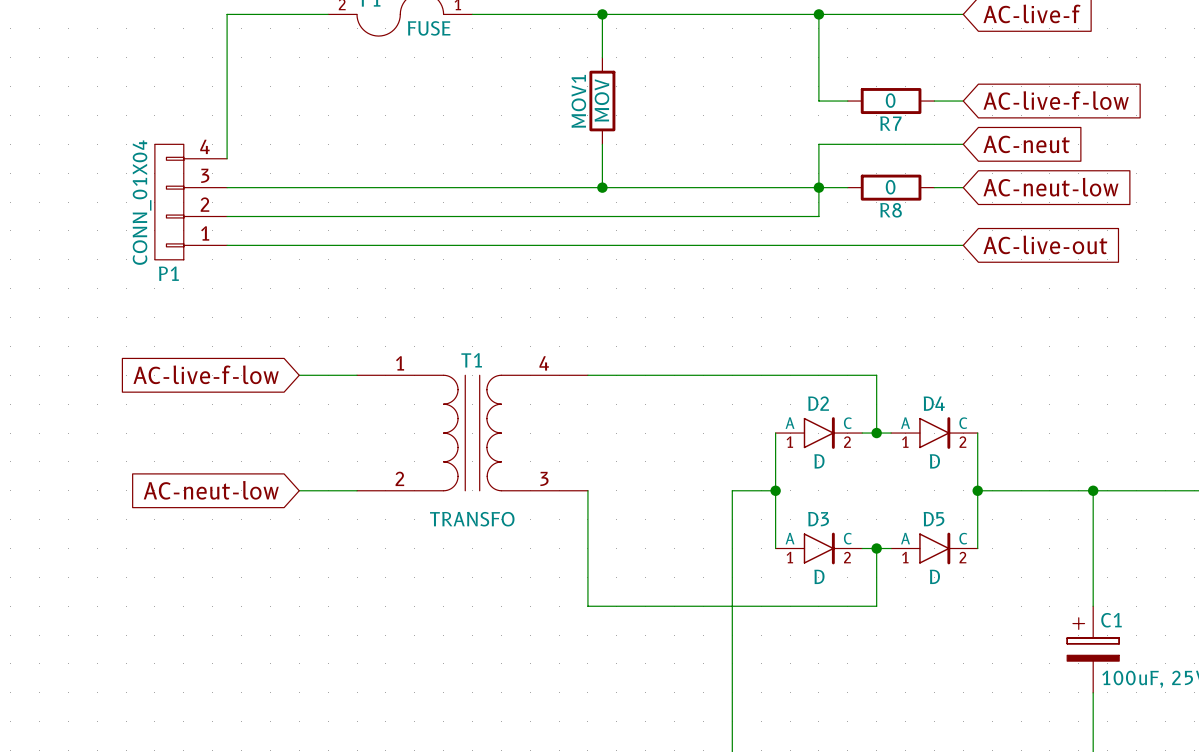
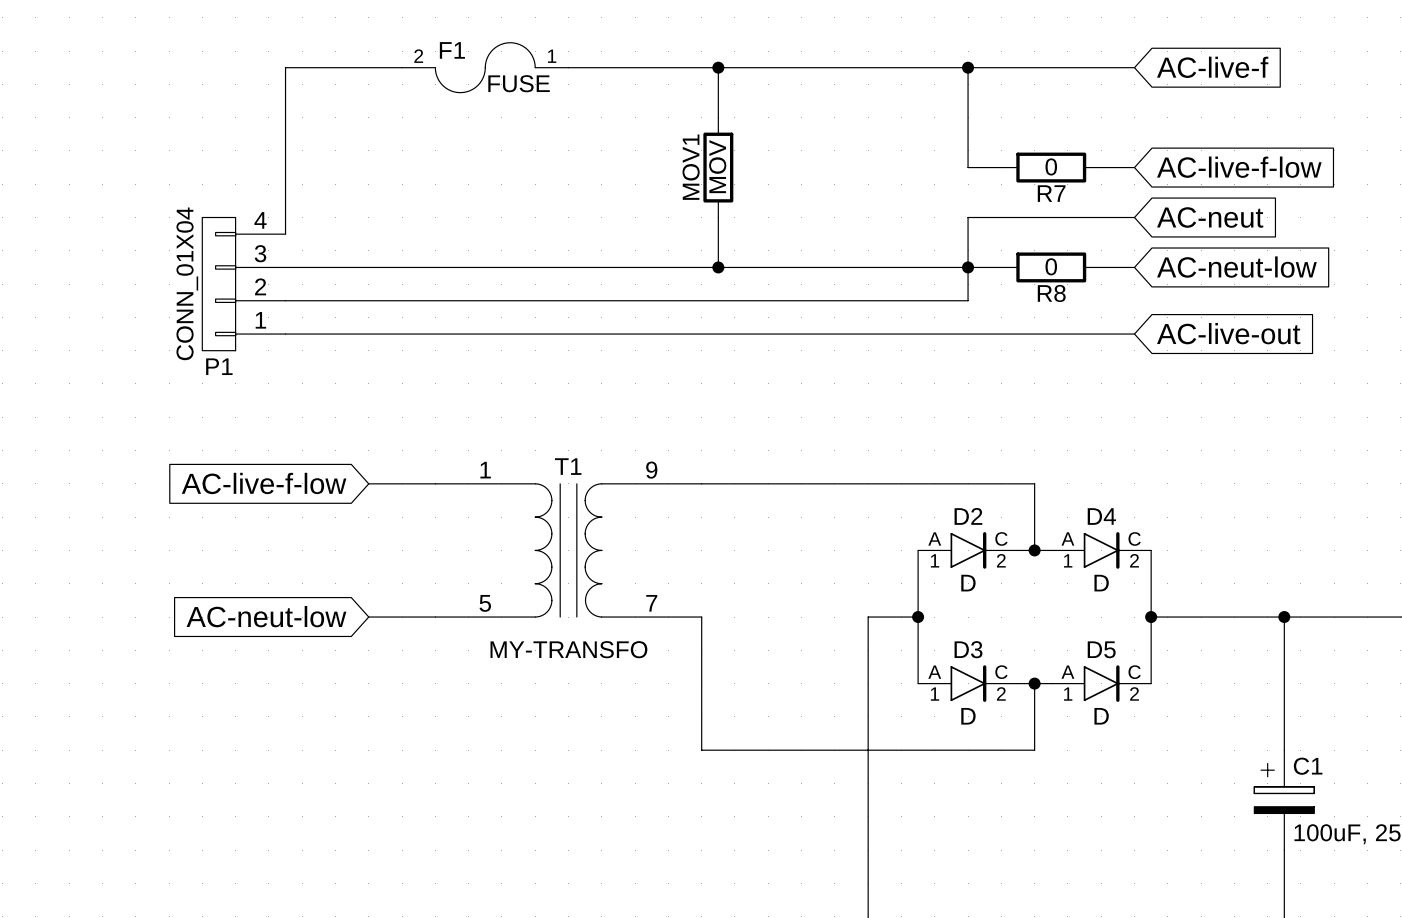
T1 pin number: 4 (544, 363) -> 9 (651, 470)
T1 pin number: 2 (399, 478) -> 5 (485, 603)
T1 pin number: 3 (544, 478) -> 7 (651, 603)
T1 value: TRANSFO (472, 519) -> MY-TRANSFO (568, 649)

